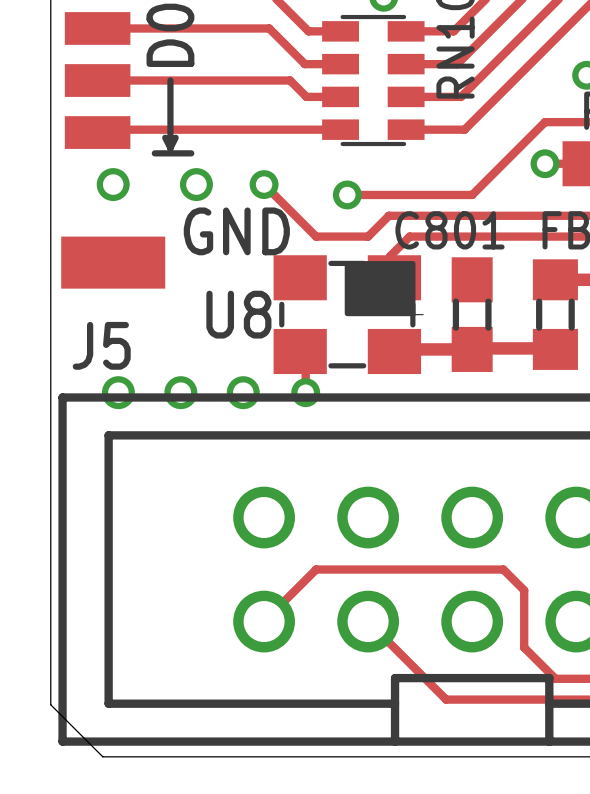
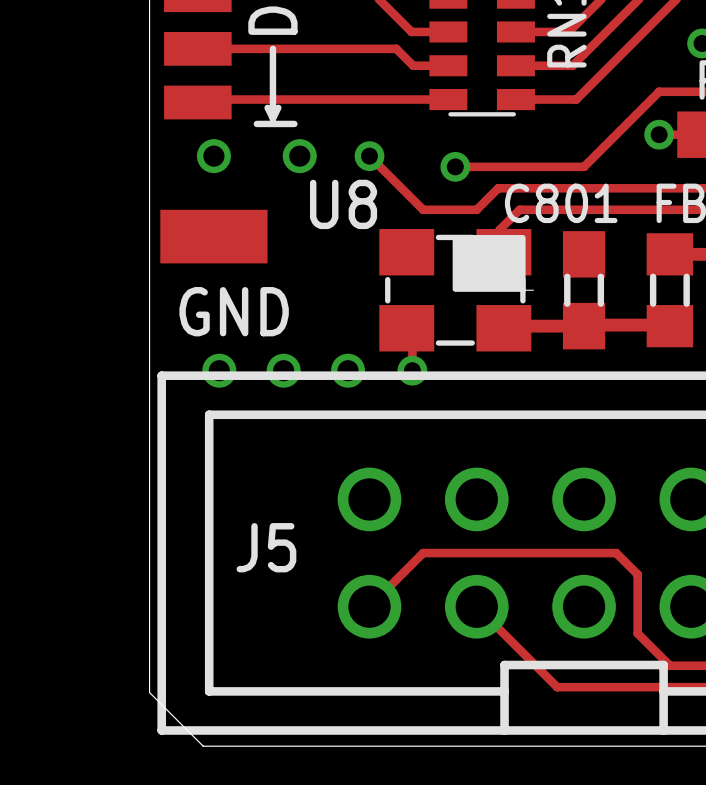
text: GND (236, 231) -> U8 (343, 204)
text: U8 (238, 314) -> none
text: J5 (101, 345) -> GND (234, 311)
text: none -> J5 (266, 547)

